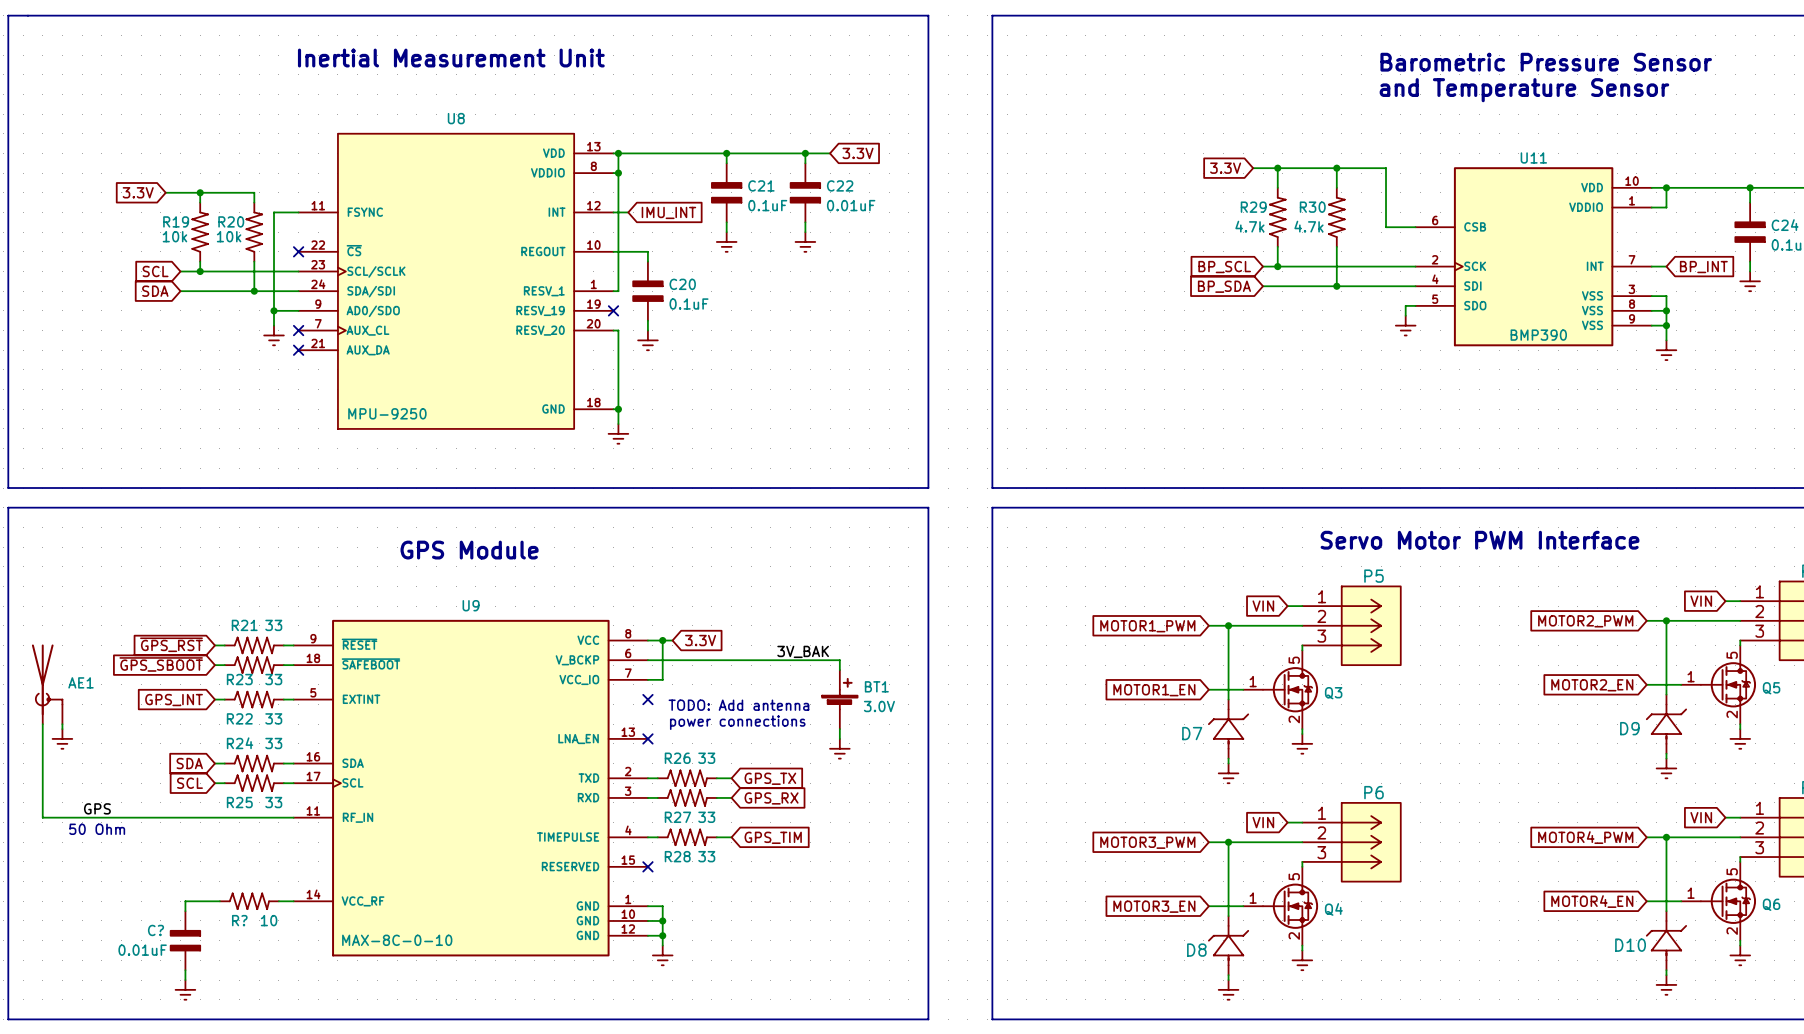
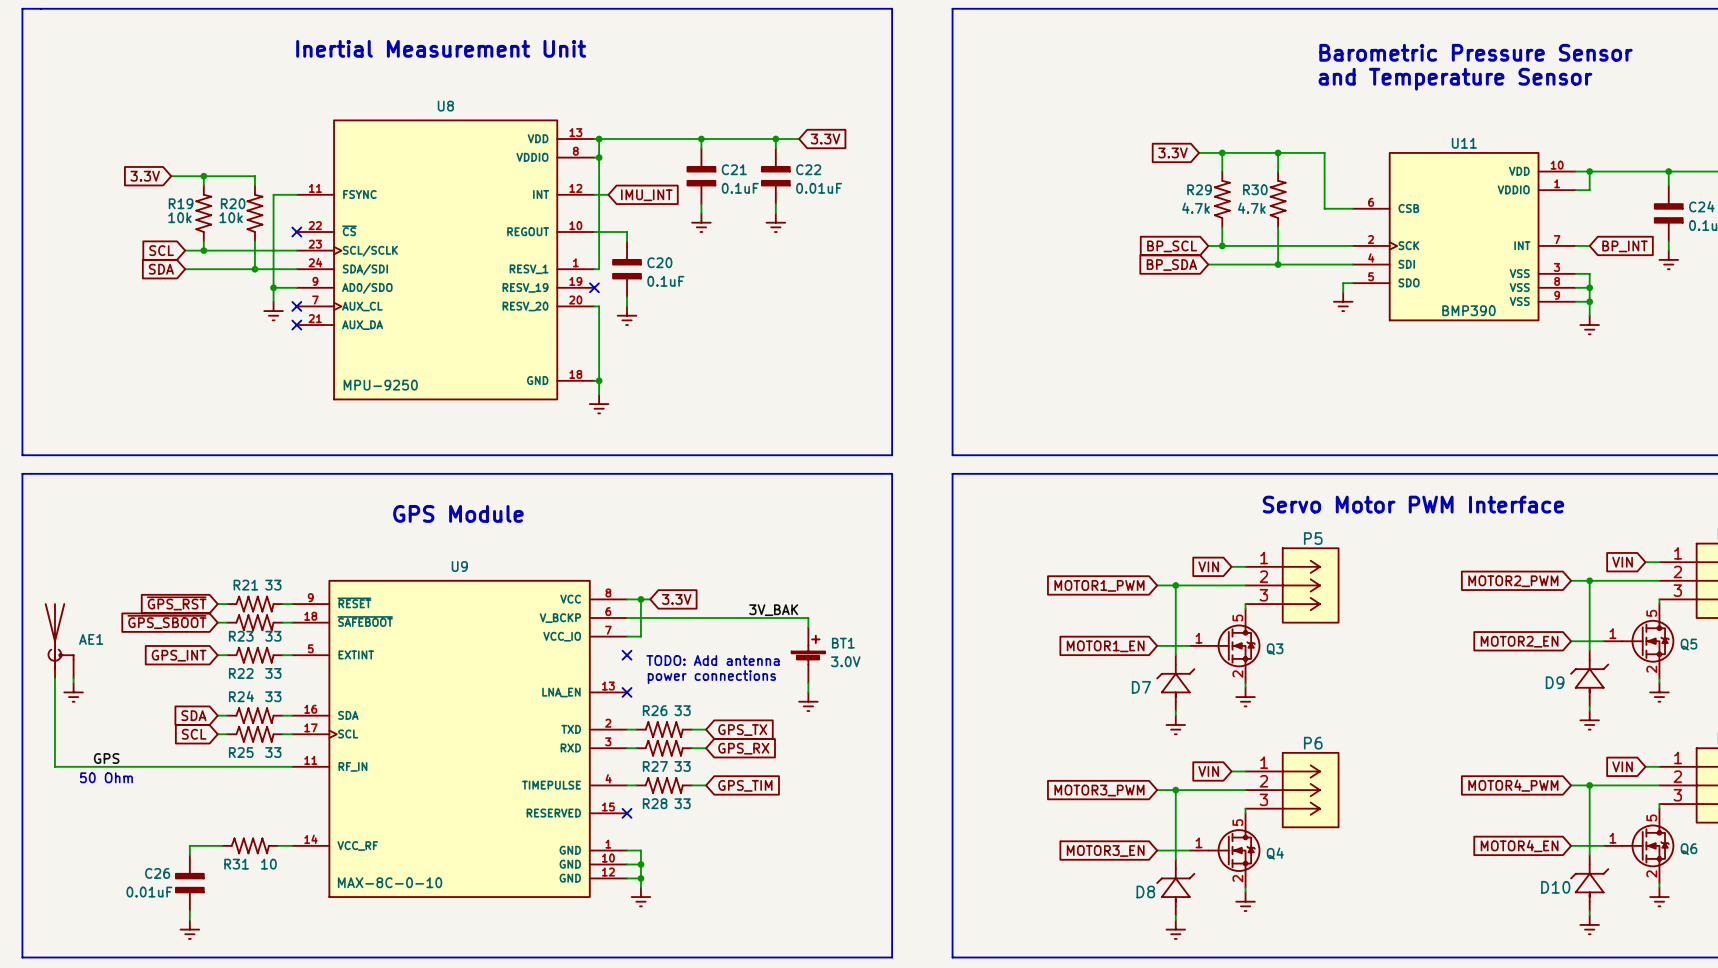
R? name: R? (239, 920) -> R31 (236, 864)
C? name: C? (155, 930) -> C26 (157, 873)

